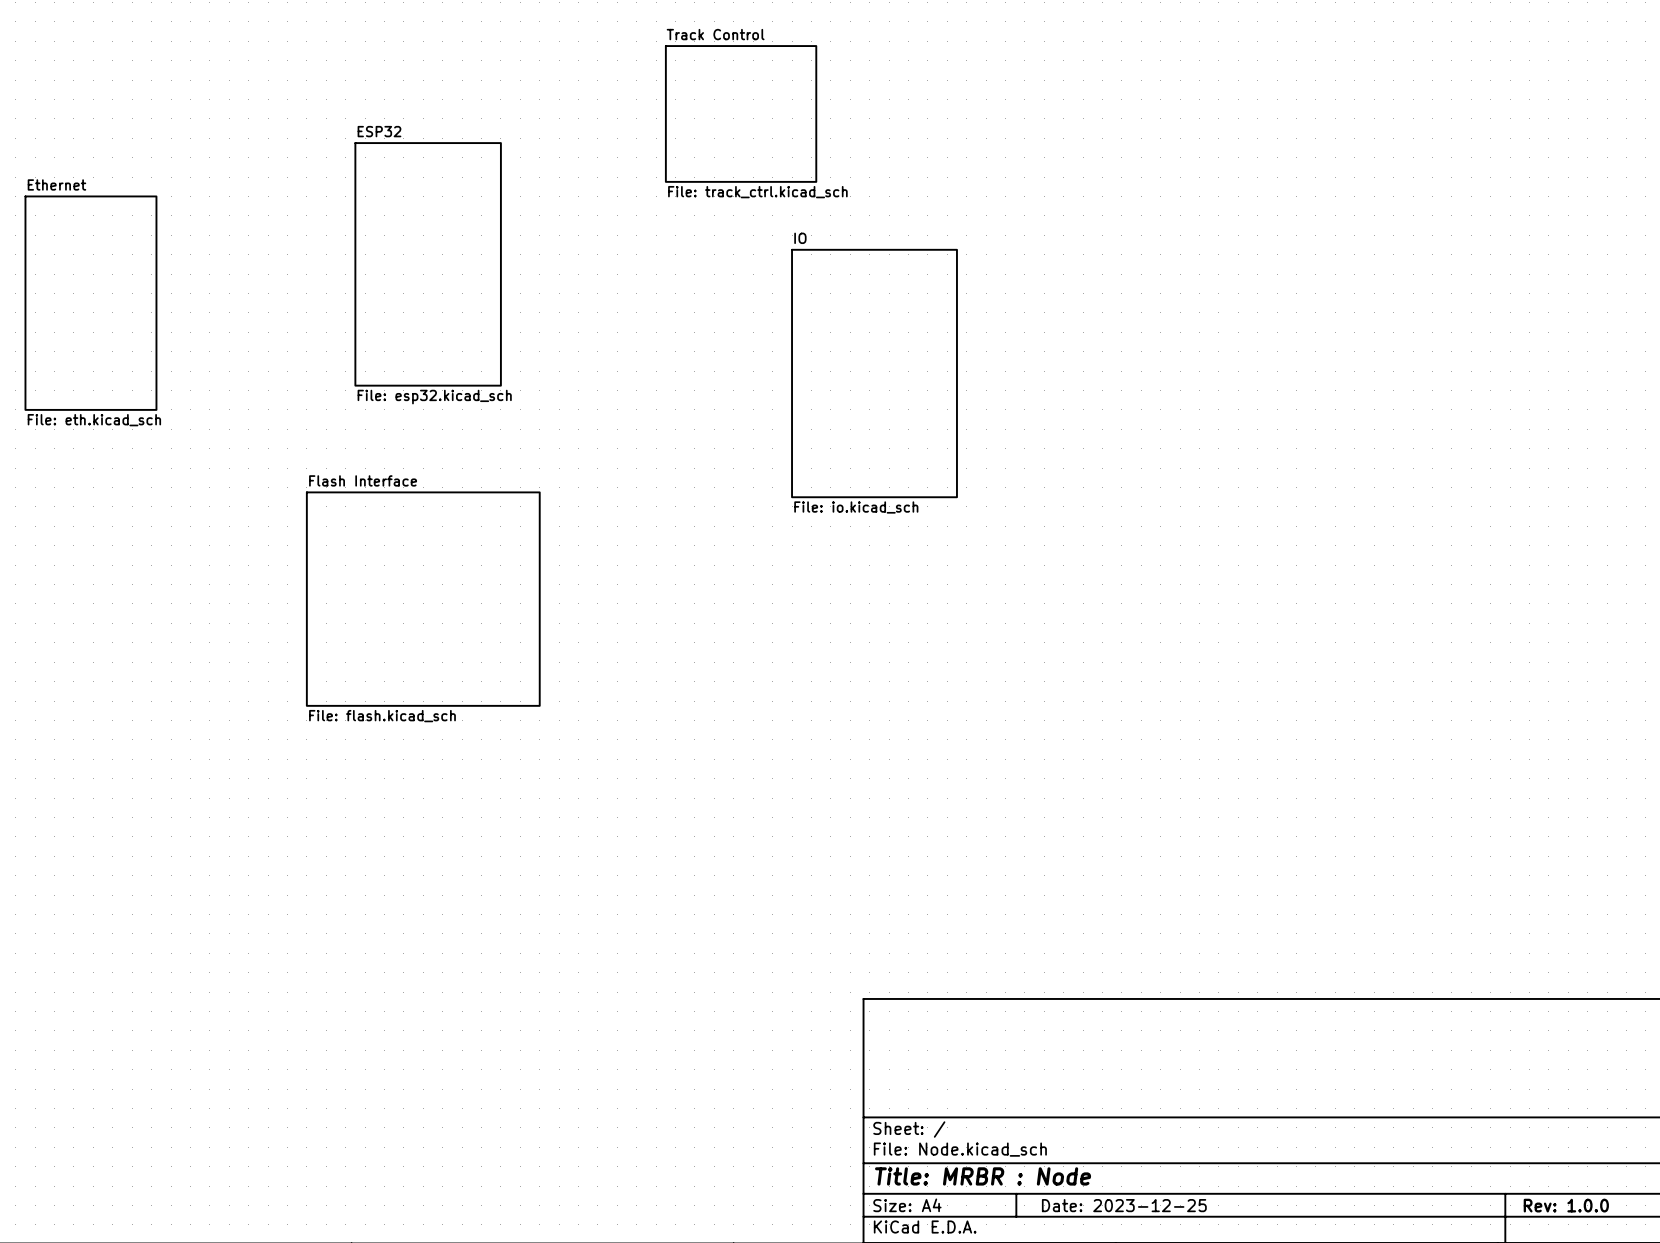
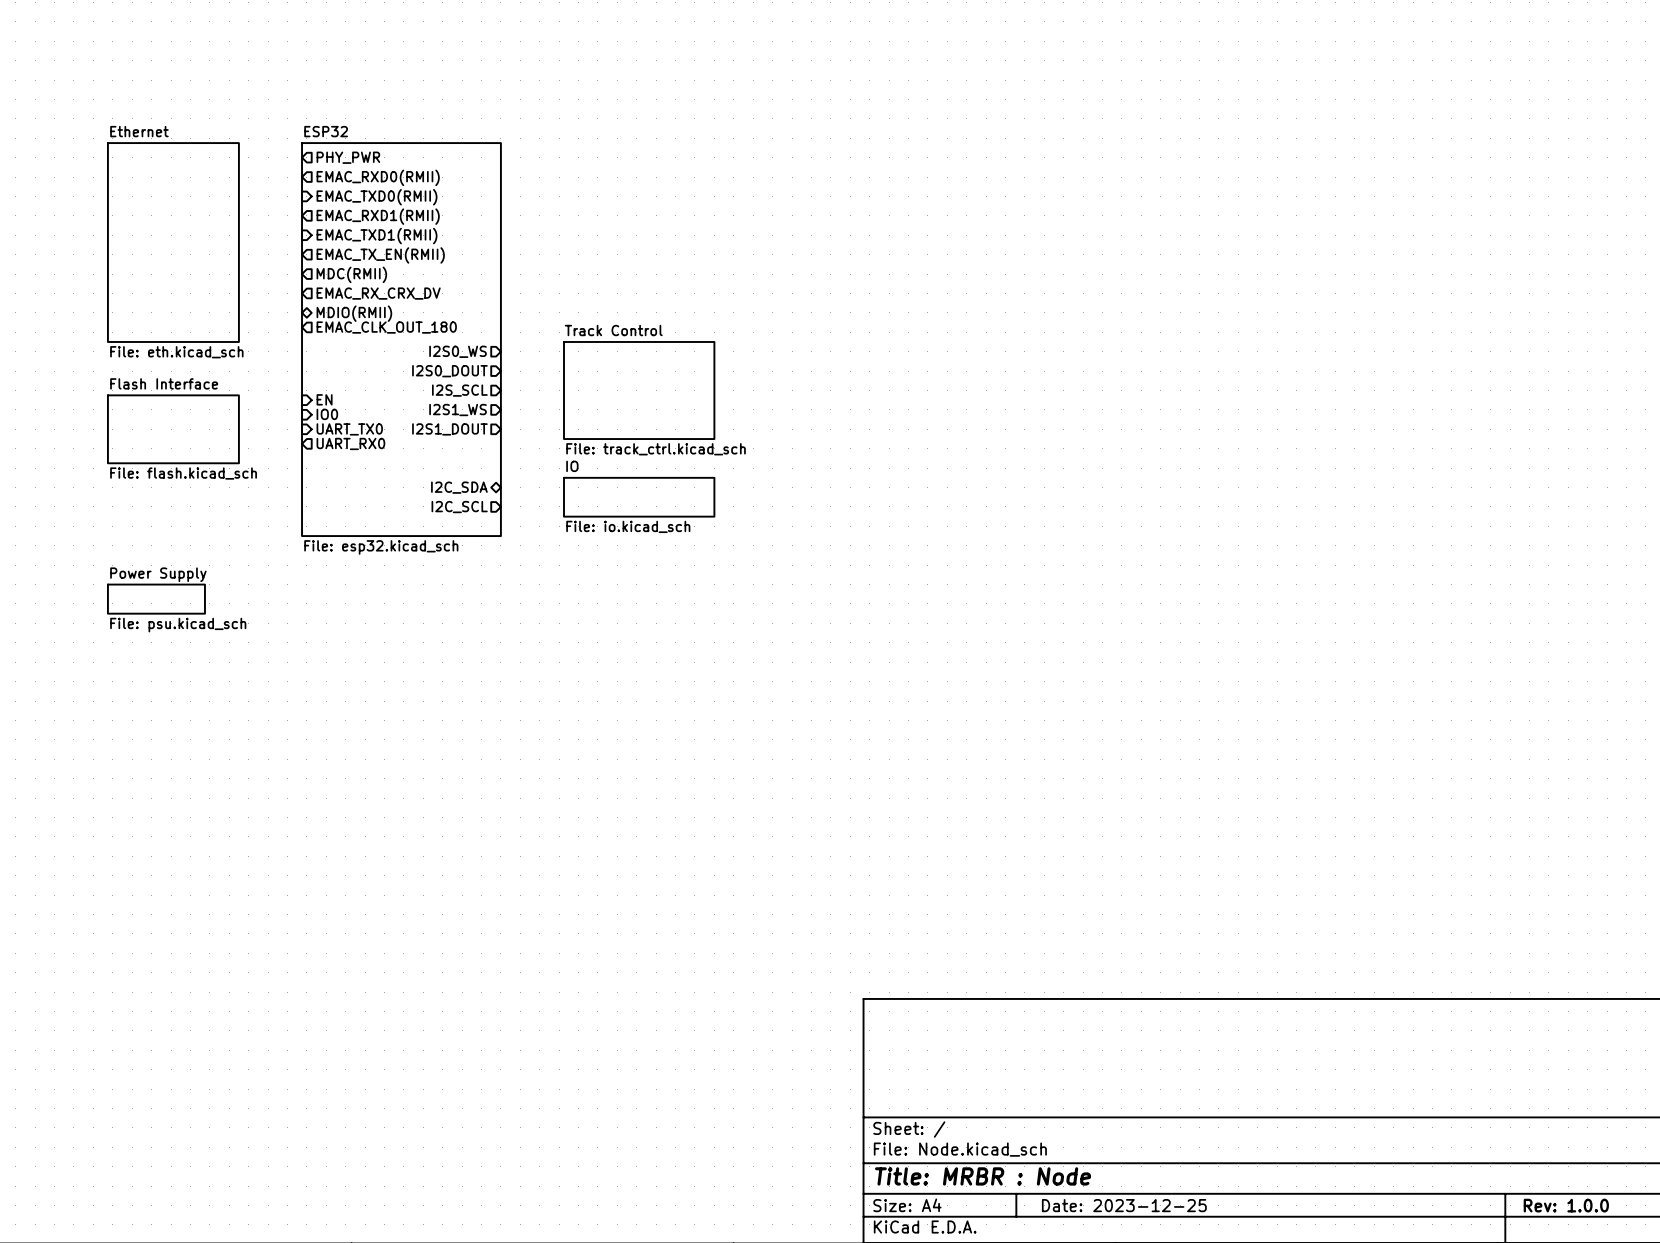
sheet Track Control: File: track_ctrl.kicad_sch (741, 113) -> none
sheet ESP32 name position: ESP32 (379, 131) -> ESP32 (326, 131)
sheet ESP32 shape: [354, 142, 502, 387] -> [301, 142, 502, 537]
sheet pin: none -> PHY_PWR (348, 157)
sheet pin: none -> EMAC_RXD0(RMII) (378, 177)
sheet pin: none -> EMAC_TXD0(RMII) (377, 197)
sheet pin: none -> EMAC_RXD1(RMII) (378, 216)
sheet pin: none -> EMAC_TXD1(RMII) (377, 236)
sheet Ethernet: none -> File: eth.kicad_sch (173, 242)
sheet pin: none -> EMAC_TX_EN(RMII) (380, 255)
sheet pin: none -> MDC(RMII) (351, 274)
sheet pin: none -> EMAC_RX_CRX_DV (378, 293)
sheet Ethernet: File: eth.kicad_sch (90, 303) -> none
sheet pin: none -> MDIO(RMII) (354, 313)
sheet pin: none -> EMAC_CLK_OUT_180 (386, 327)
sheet pin: none -> I2S0_WS (458, 351)
sheet pin: none -> I2S0_DOUT (449, 371)
sheet IO: File: io.kicad_sch (874, 373) -> none
sheet pin: none -> I2S_SCL (459, 390)
sheet Track Control: none -> File: track_ctrl.kicad_sch (639, 390)
sheet ESP32 value position: File: esp32.kicad_sch (434, 397) -> File: esp32.kicad_sch (381, 547)
sheet pin: none -> EN (324, 399)
sheet pin: none -> I2S1_WS (458, 410)
sheet pin: none -> IO0 (327, 414)
sheet Flash Interface: none -> File: flash.kicad_sch (173, 429)
sheet pin: none -> UART_TX0 (349, 429)
sheet pin: none -> I2S1_DOUT (449, 429)
sheet pin: none -> UART_RX0 (350, 443)
sheet pin: none -> I2C_SDA (459, 487)
sheet IO: none -> File: io.kicad_sch (639, 497)
sheet pin: none -> I2C_SCL (459, 507)
sheet Power Supply: none -> File: psu.kicad_sch (156, 599)
sheet Flash Interface: File: flash.kicad_sch (423, 599) -> none

